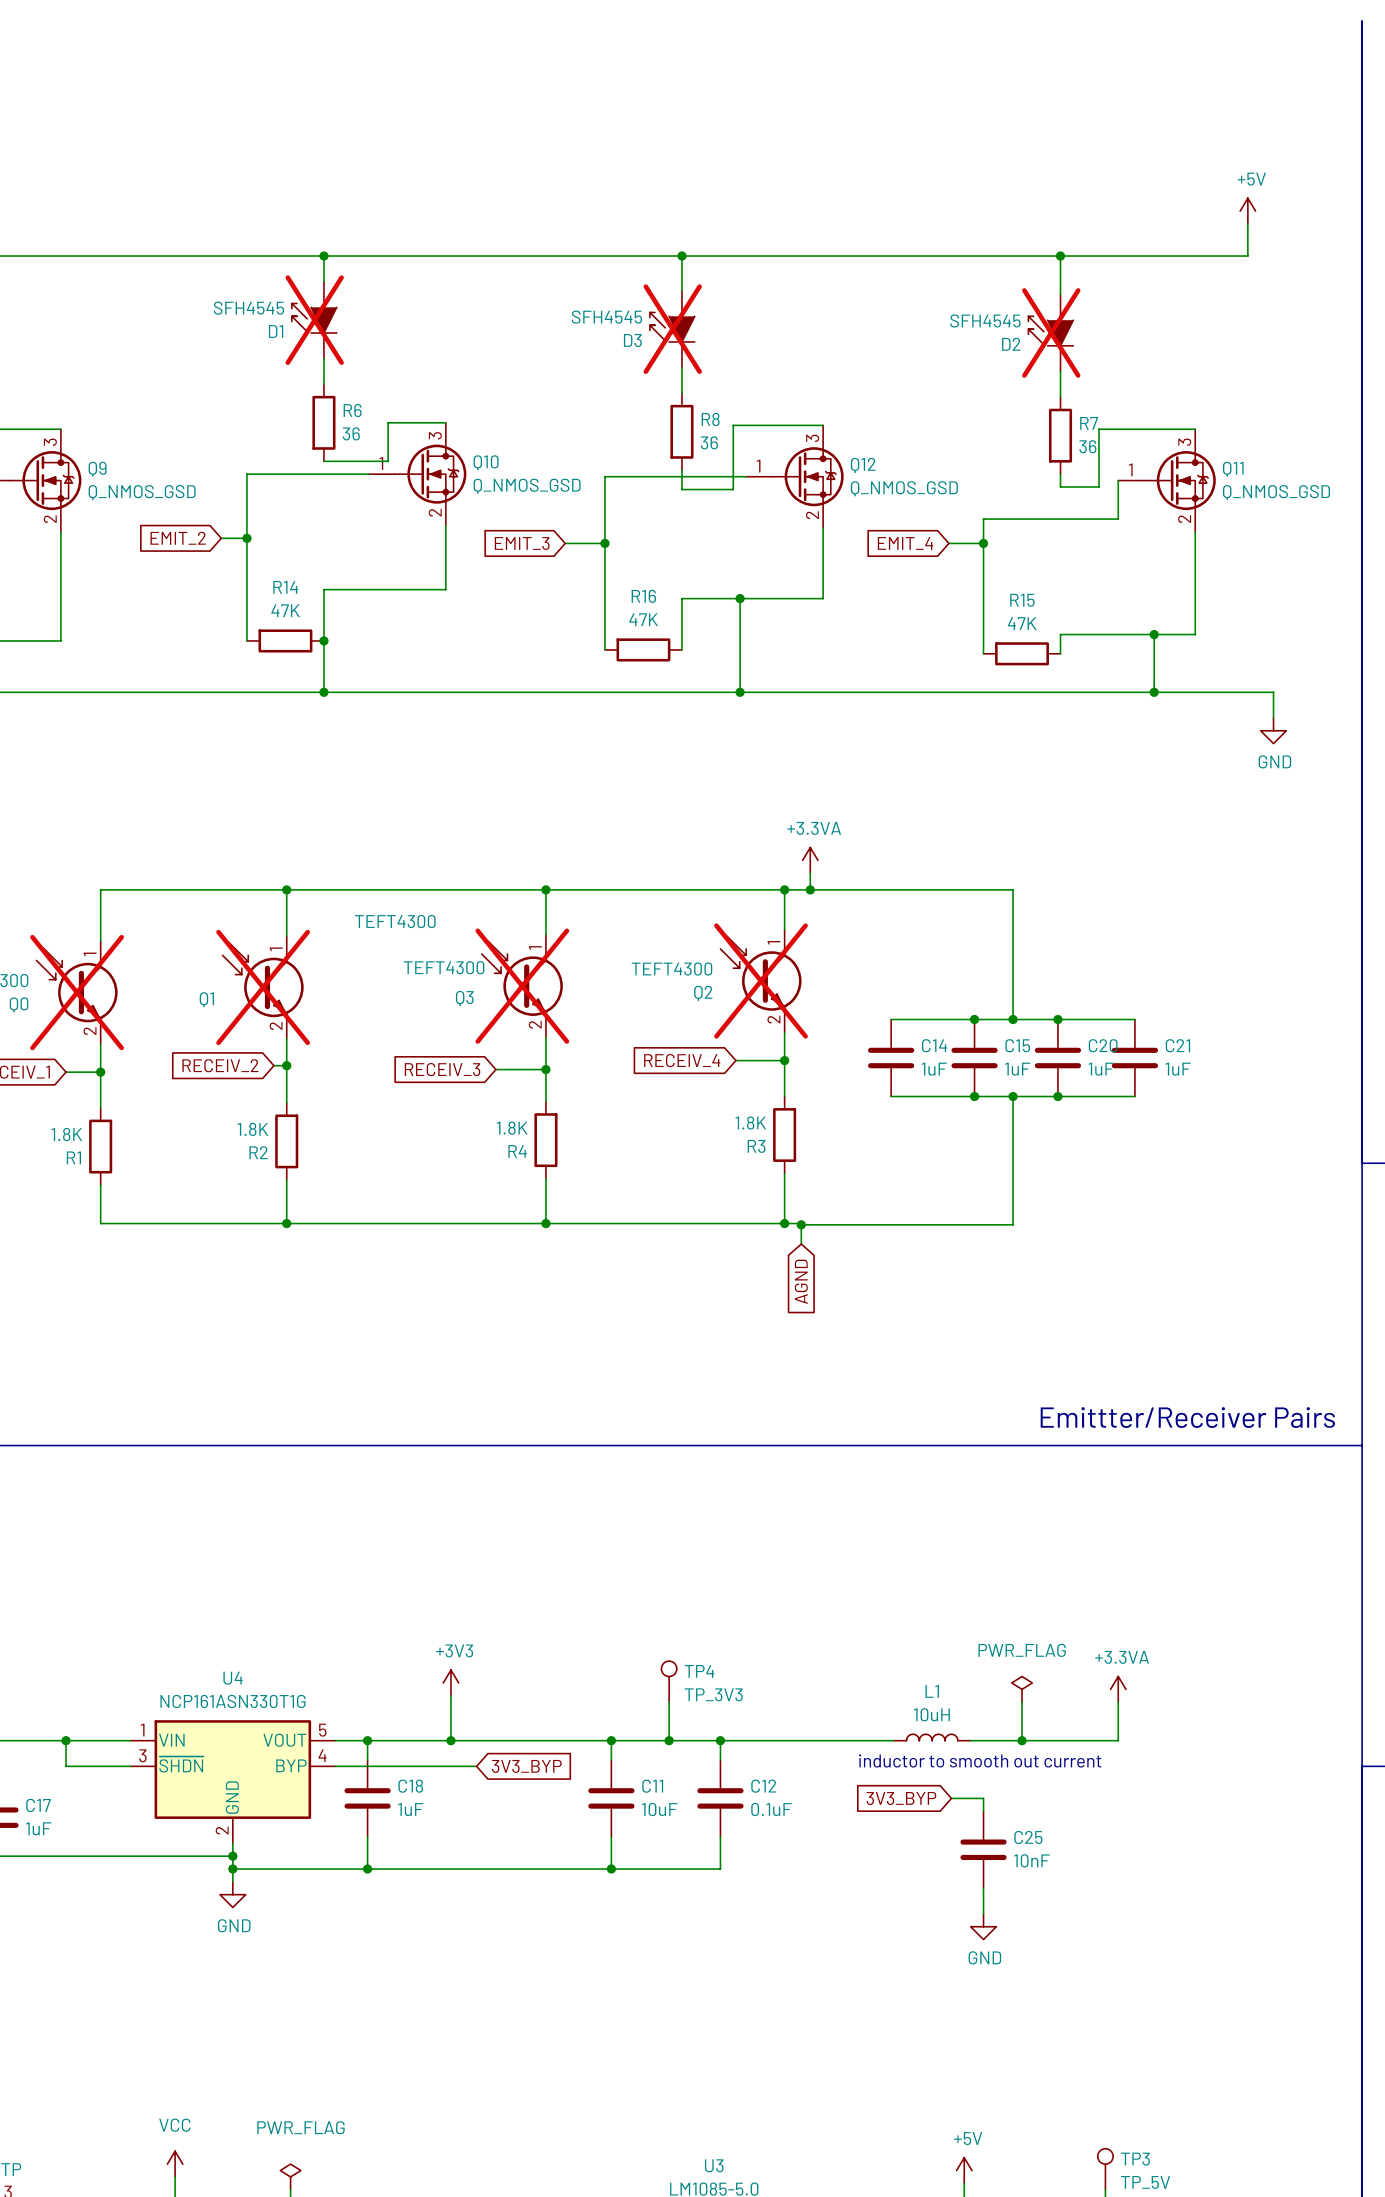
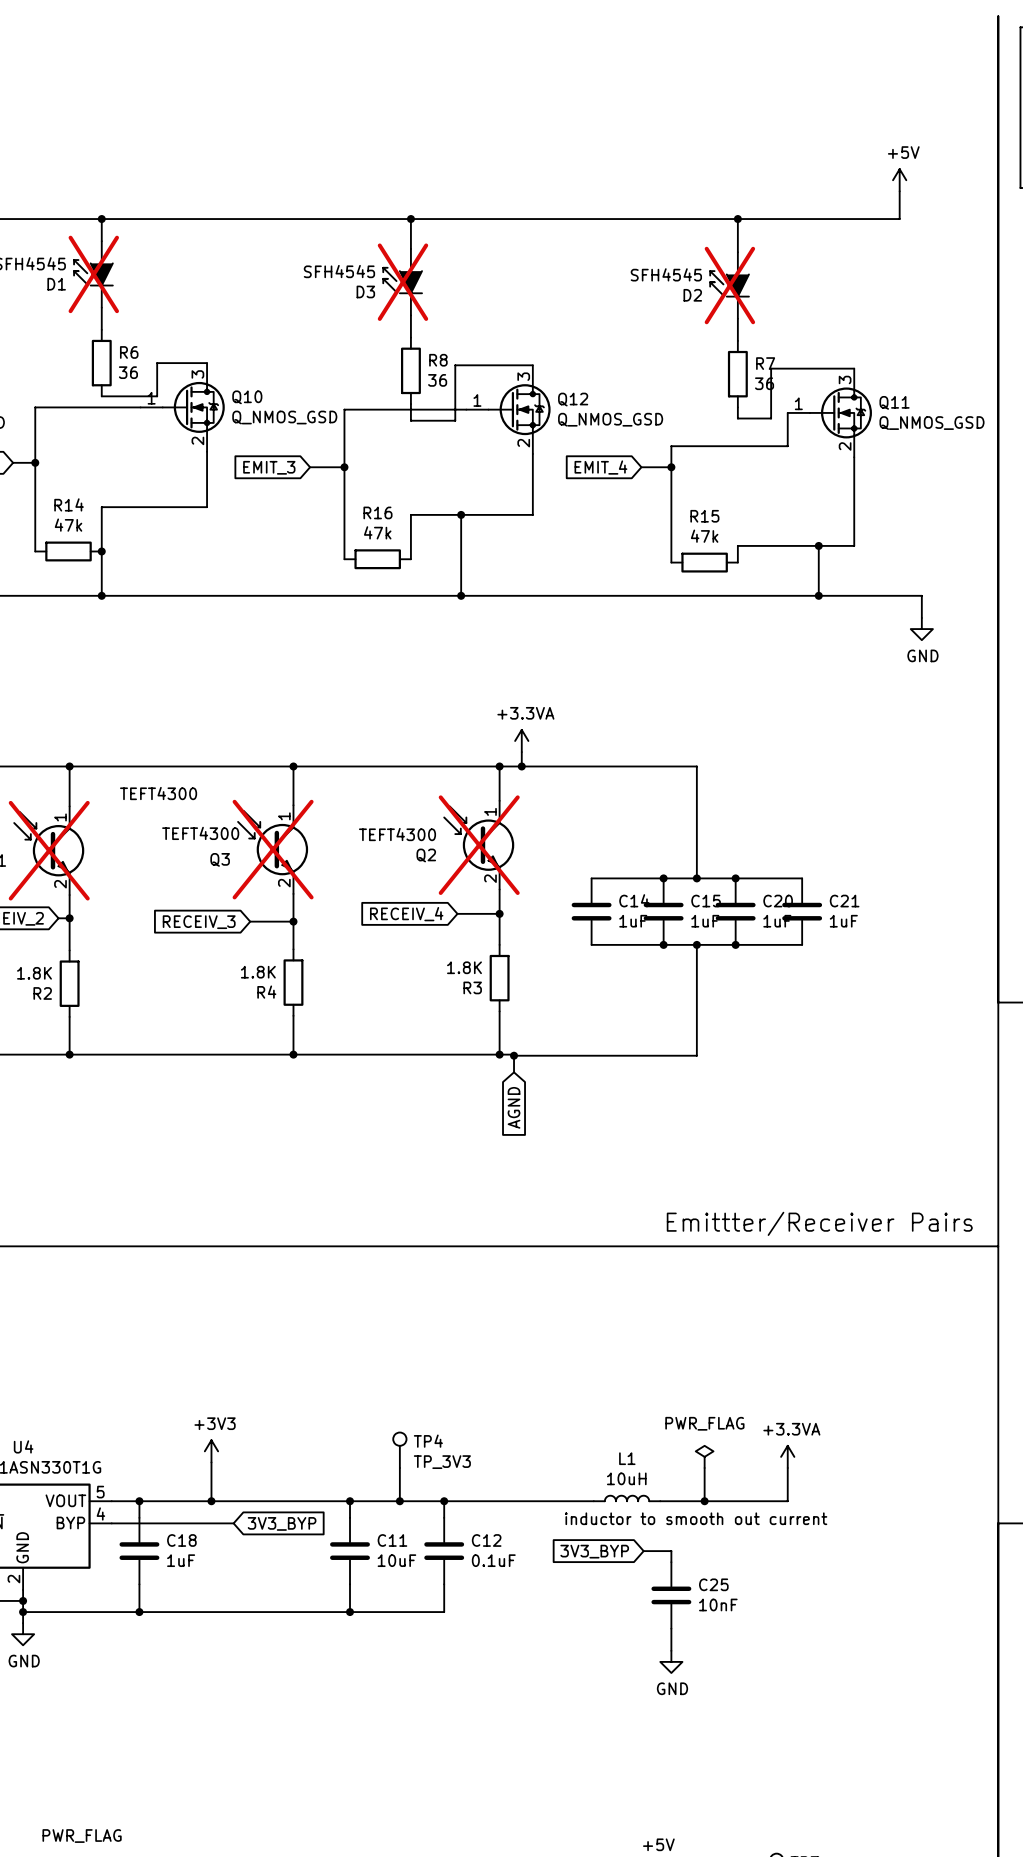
R14 value: 47K (285, 610) -> 47k (68, 525)
R16 value: 47K (643, 619) -> 47k (377, 532)
R15 value: 47K (1022, 623) -> 47k (704, 536)

